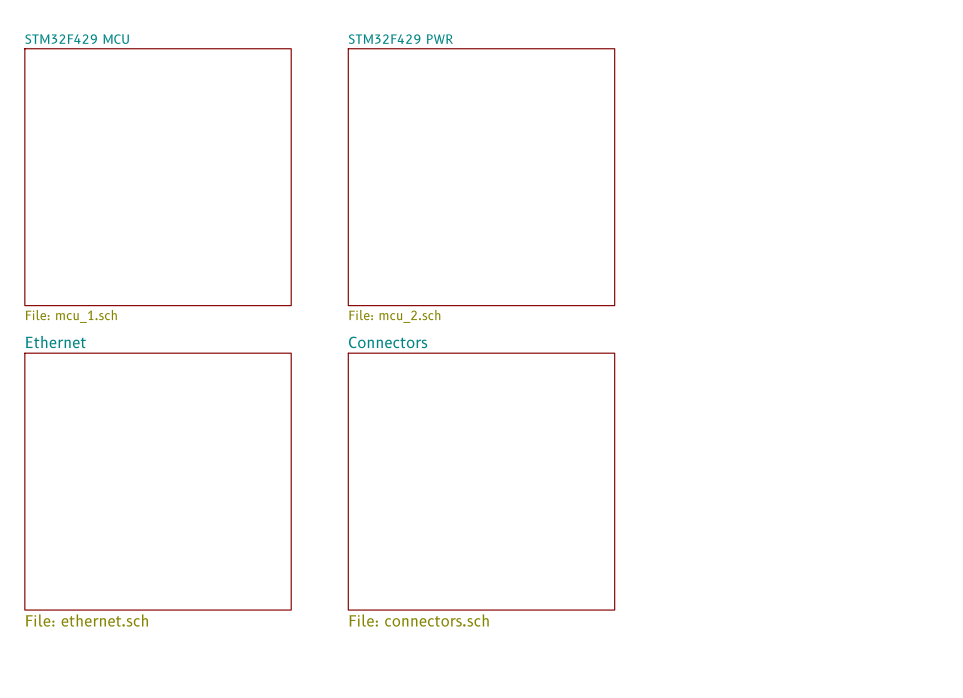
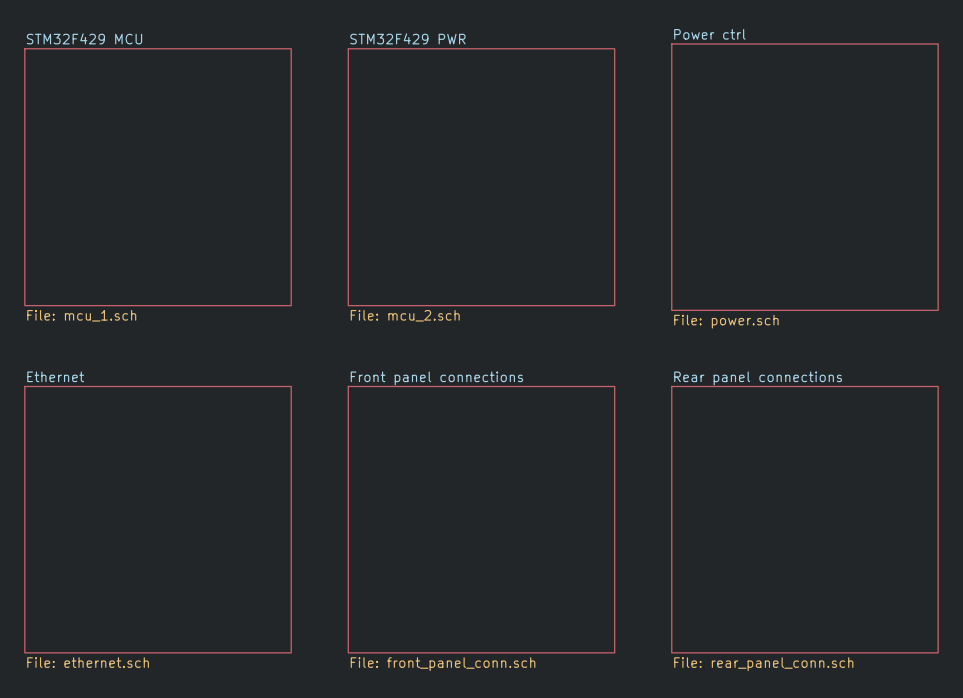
sheet Power ctrl: none -> File: power.sch (804, 177)
sheet Ethernet: File: ethernet.sch (158, 481) -> none
sheet Connectors: File: connectors.sch (481, 481) -> none
sheet Ethernet: none -> File: ethernet.sch (158, 519)
sheet Front panel connections: none -> File: front_panel_conn.sch (481, 519)
sheet Rear panel connections: none -> File: rear_panel_conn.sch (804, 519)

